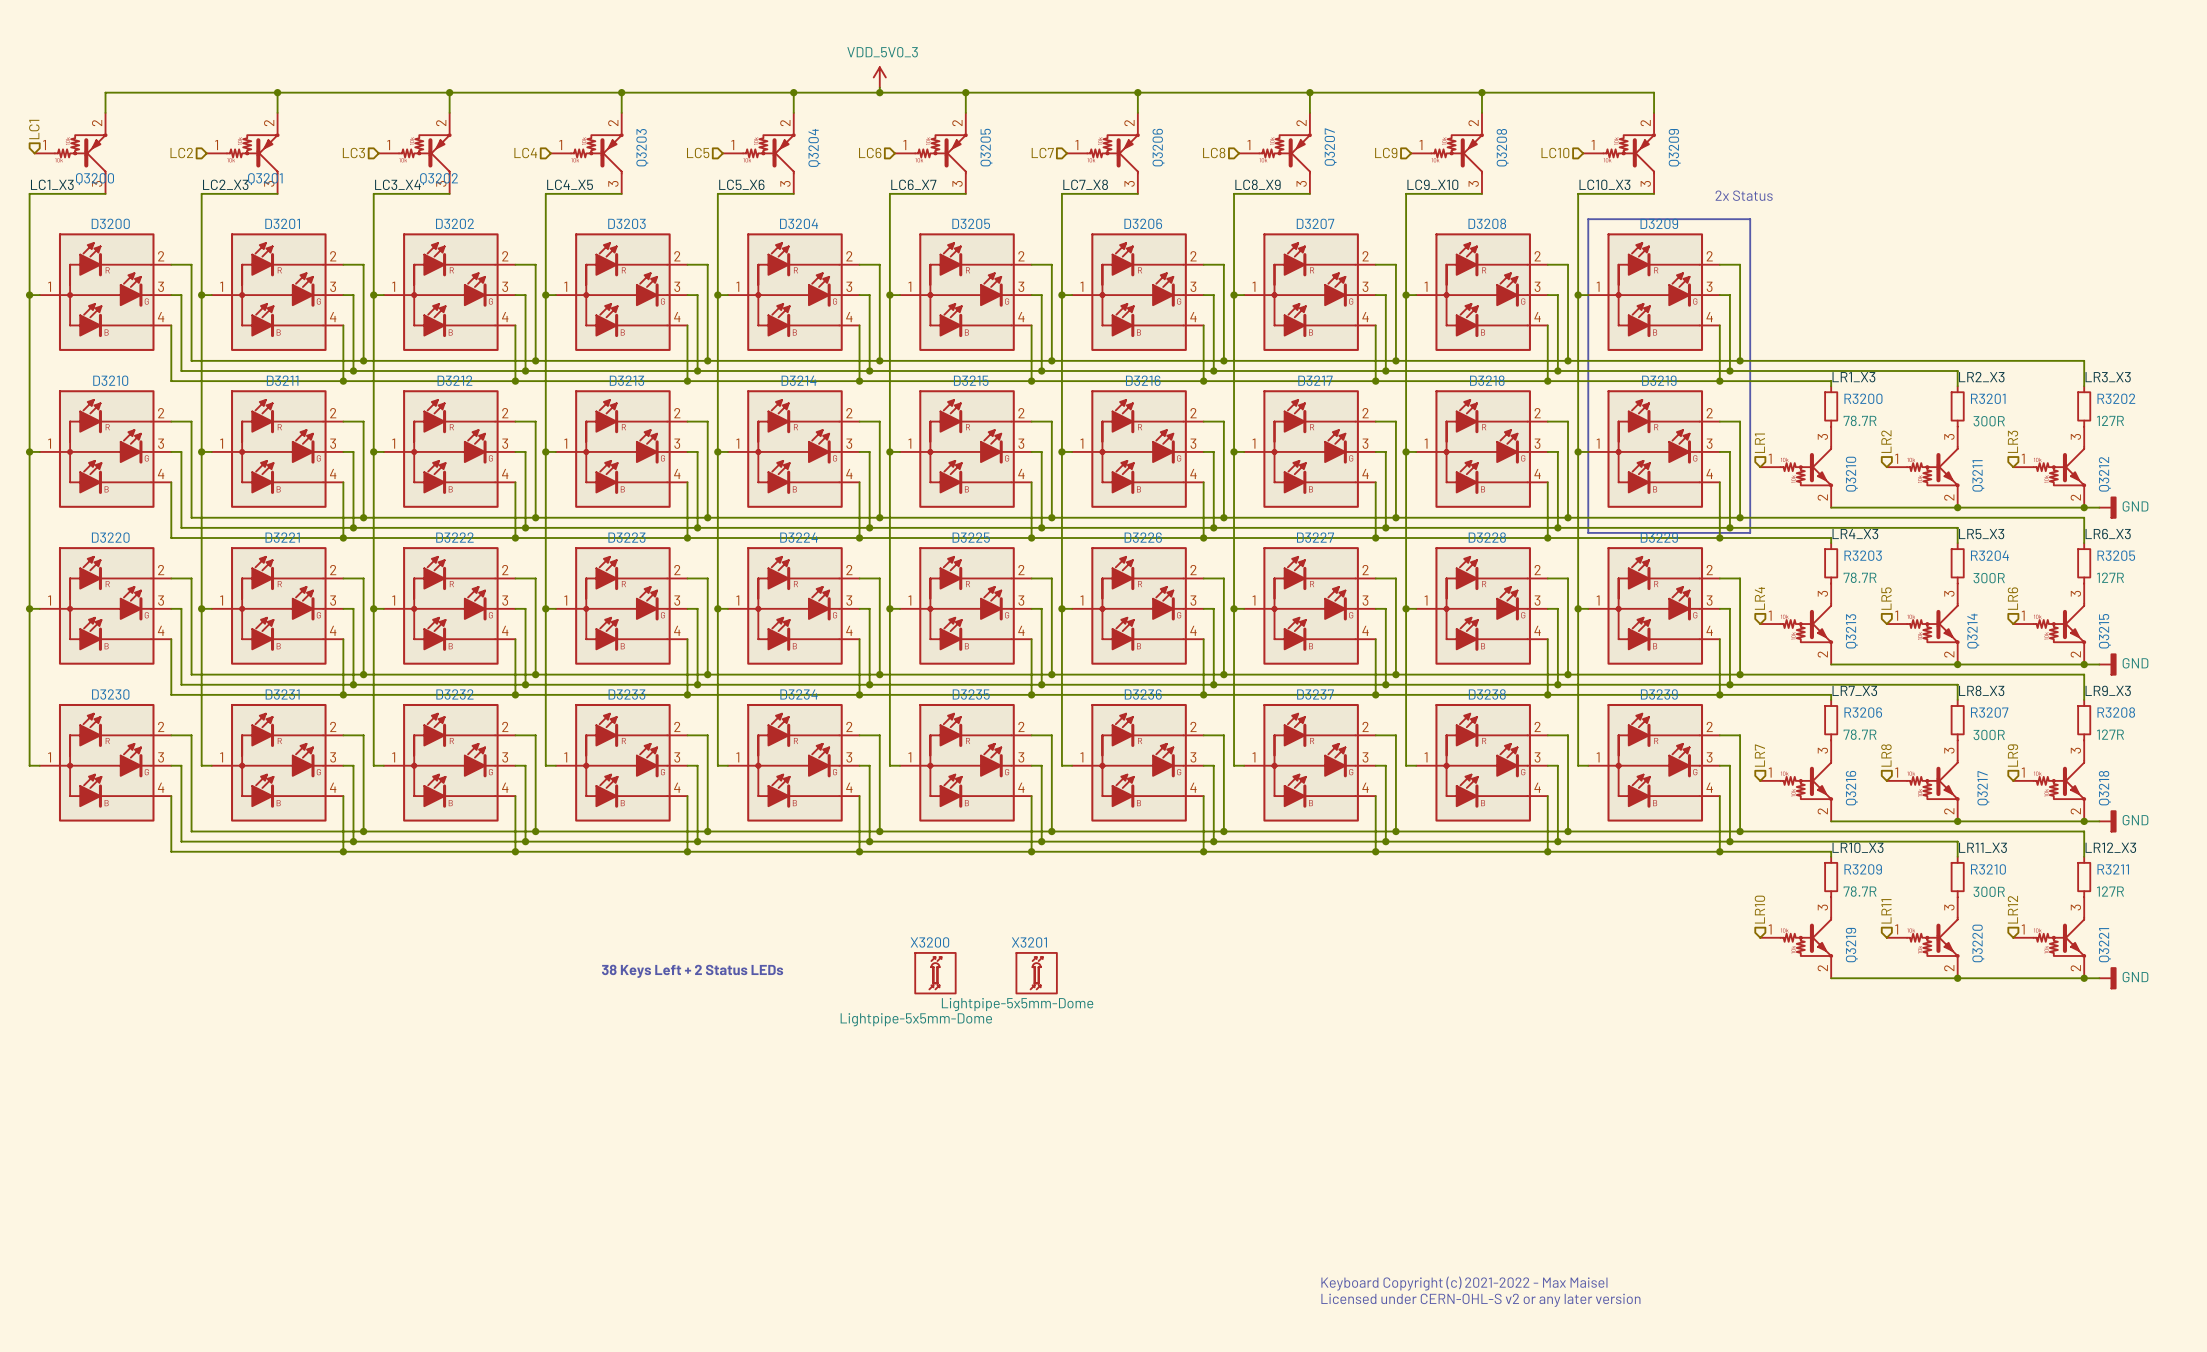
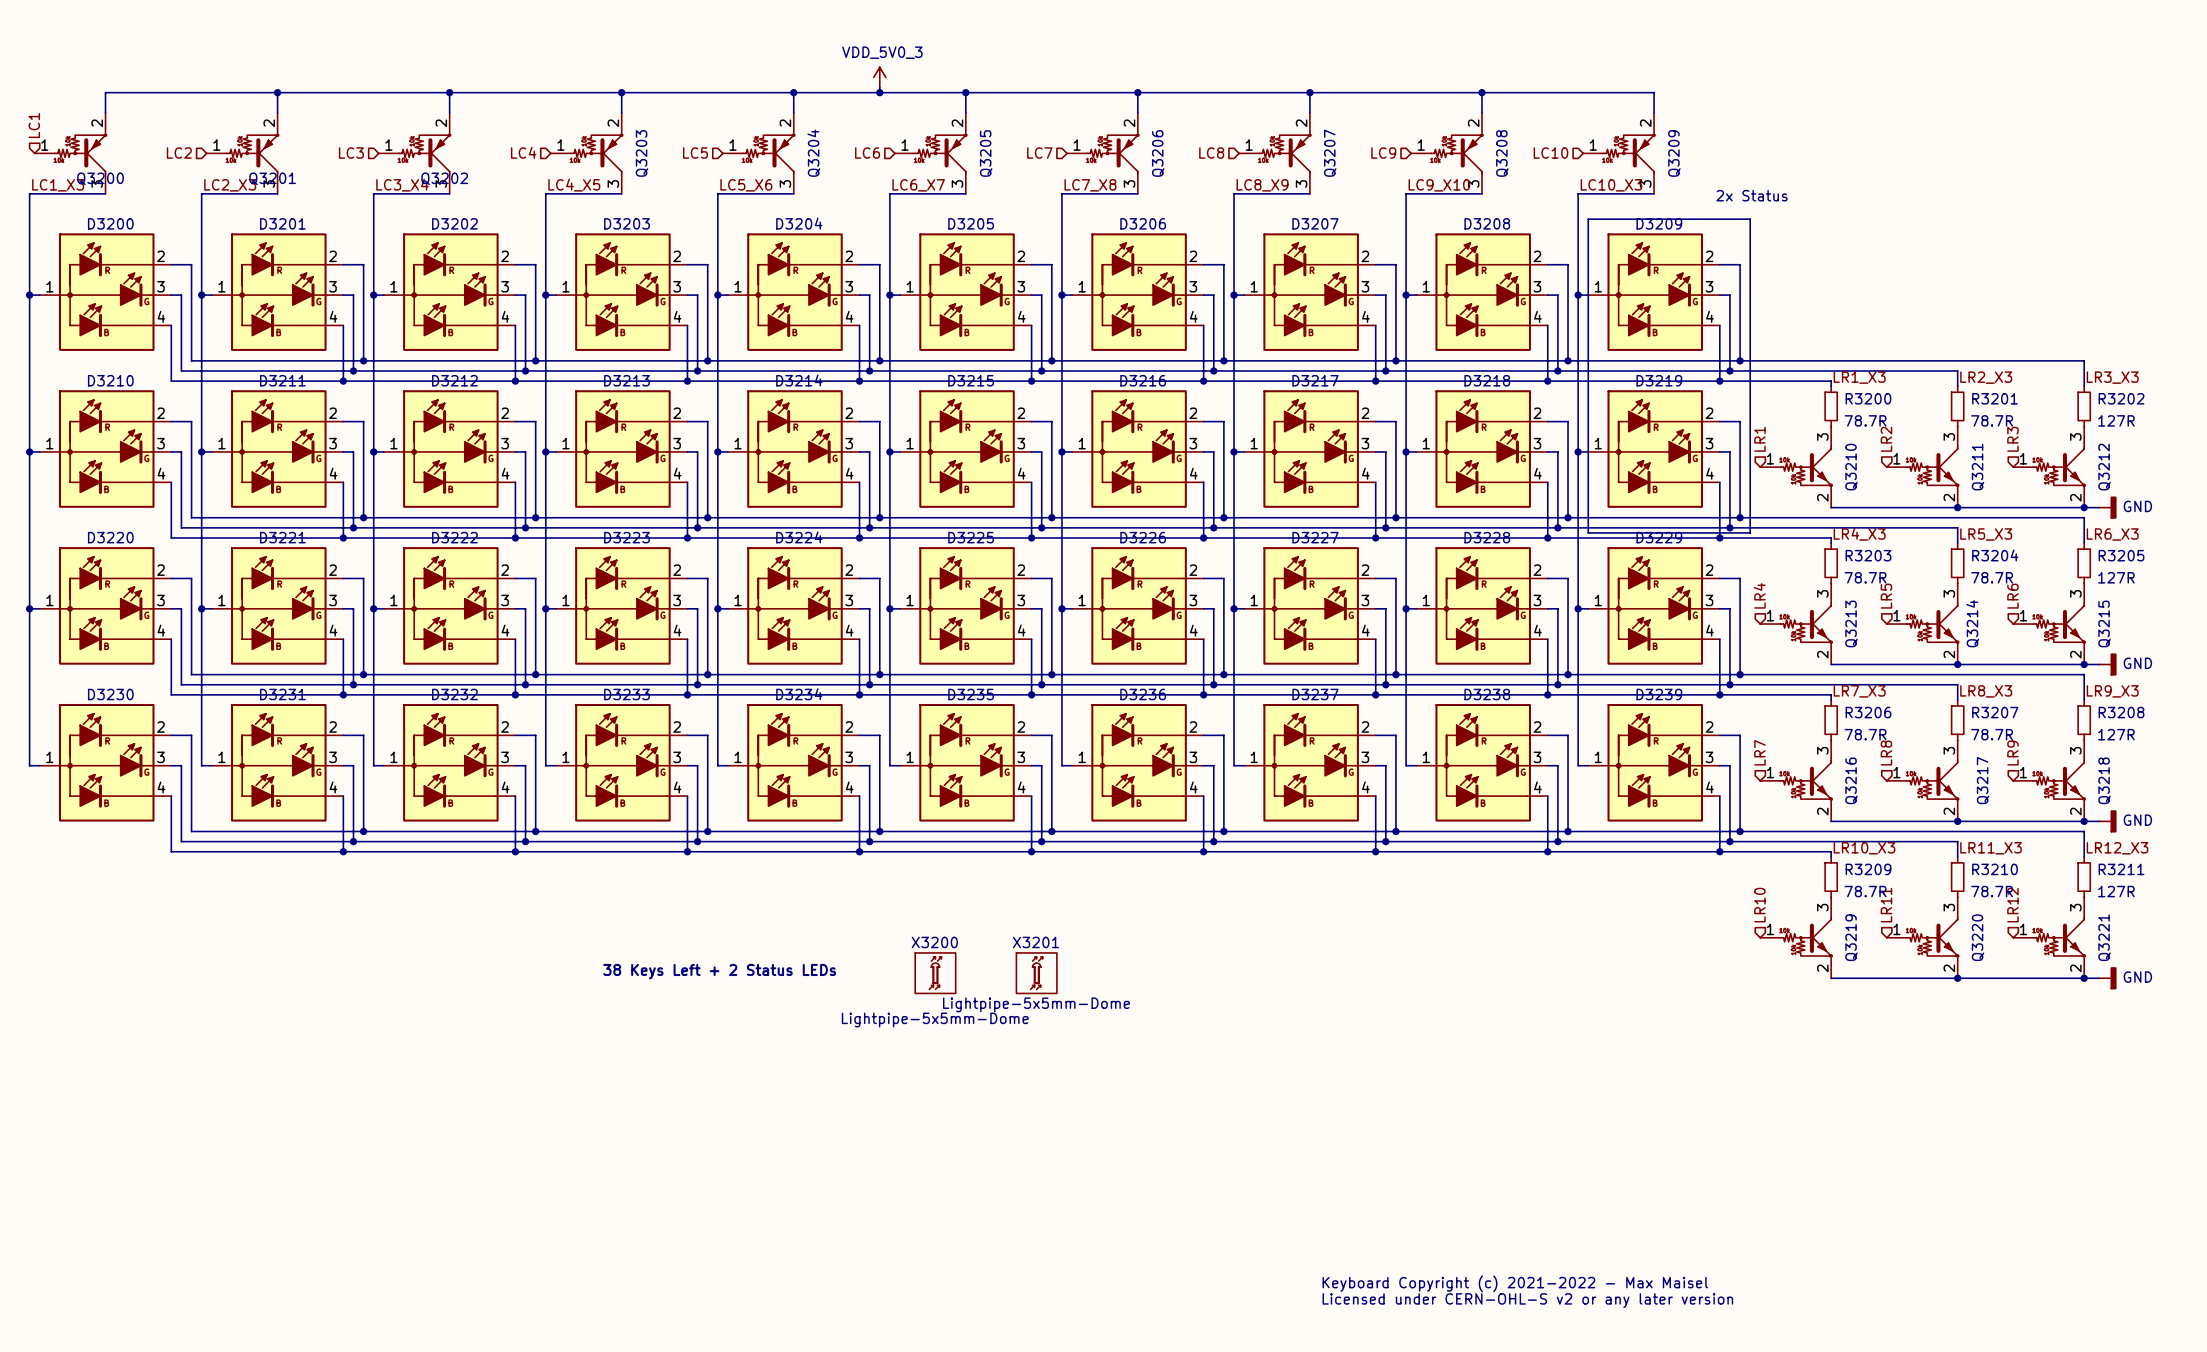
R3201 value: 300R (1989, 421) -> 78.7R (1992, 420)
R3204 value: 300R (1989, 578) -> 78.7R (1992, 577)
R3207 value: 300R (1989, 734) -> 78.7R (1992, 734)
R3210 value: 300R (1989, 891) -> 78.7R (1992, 891)

